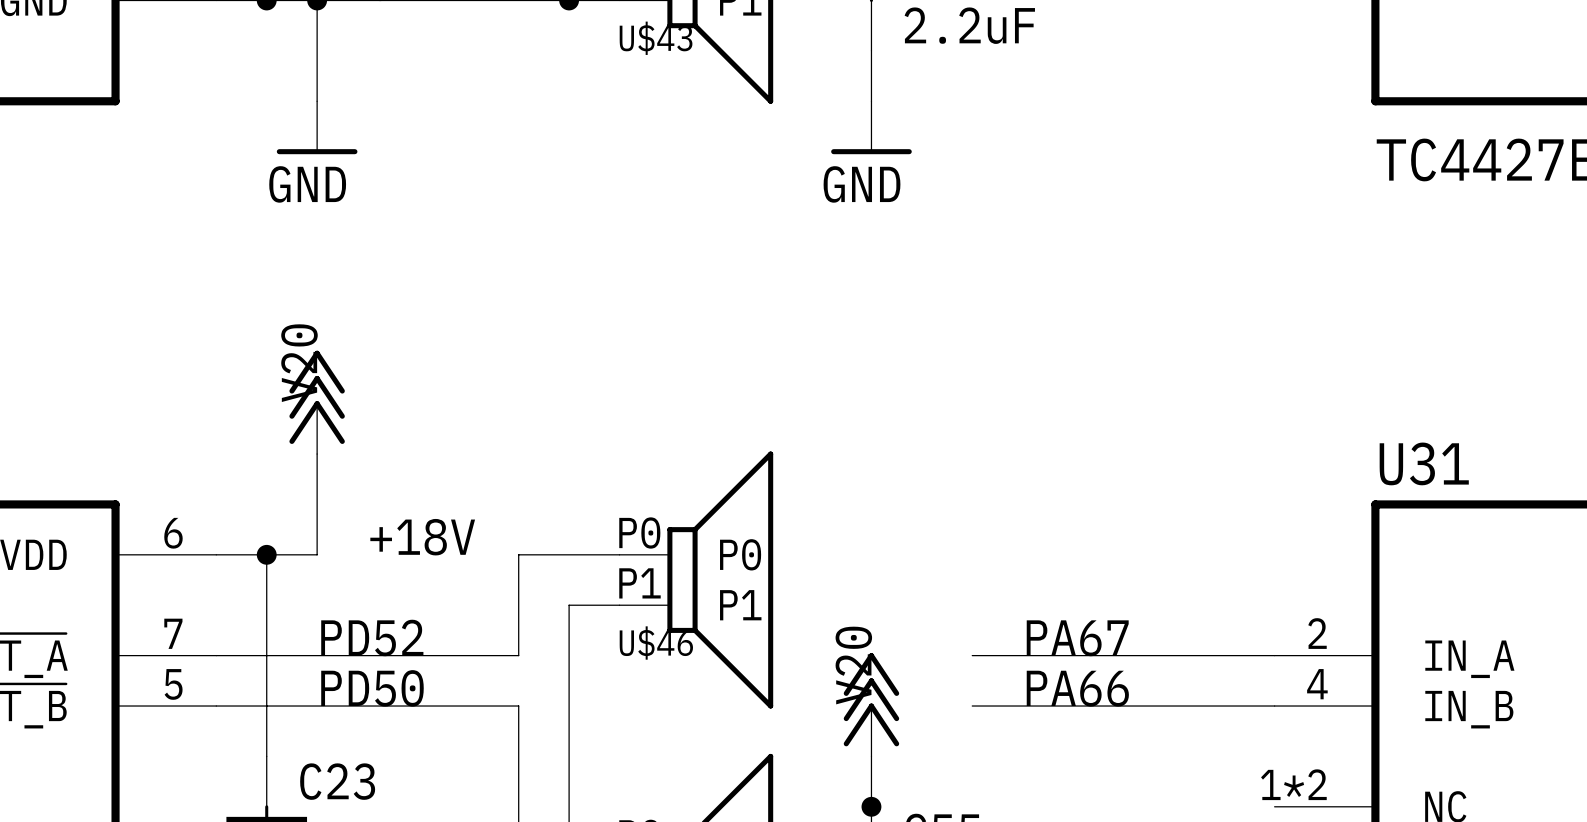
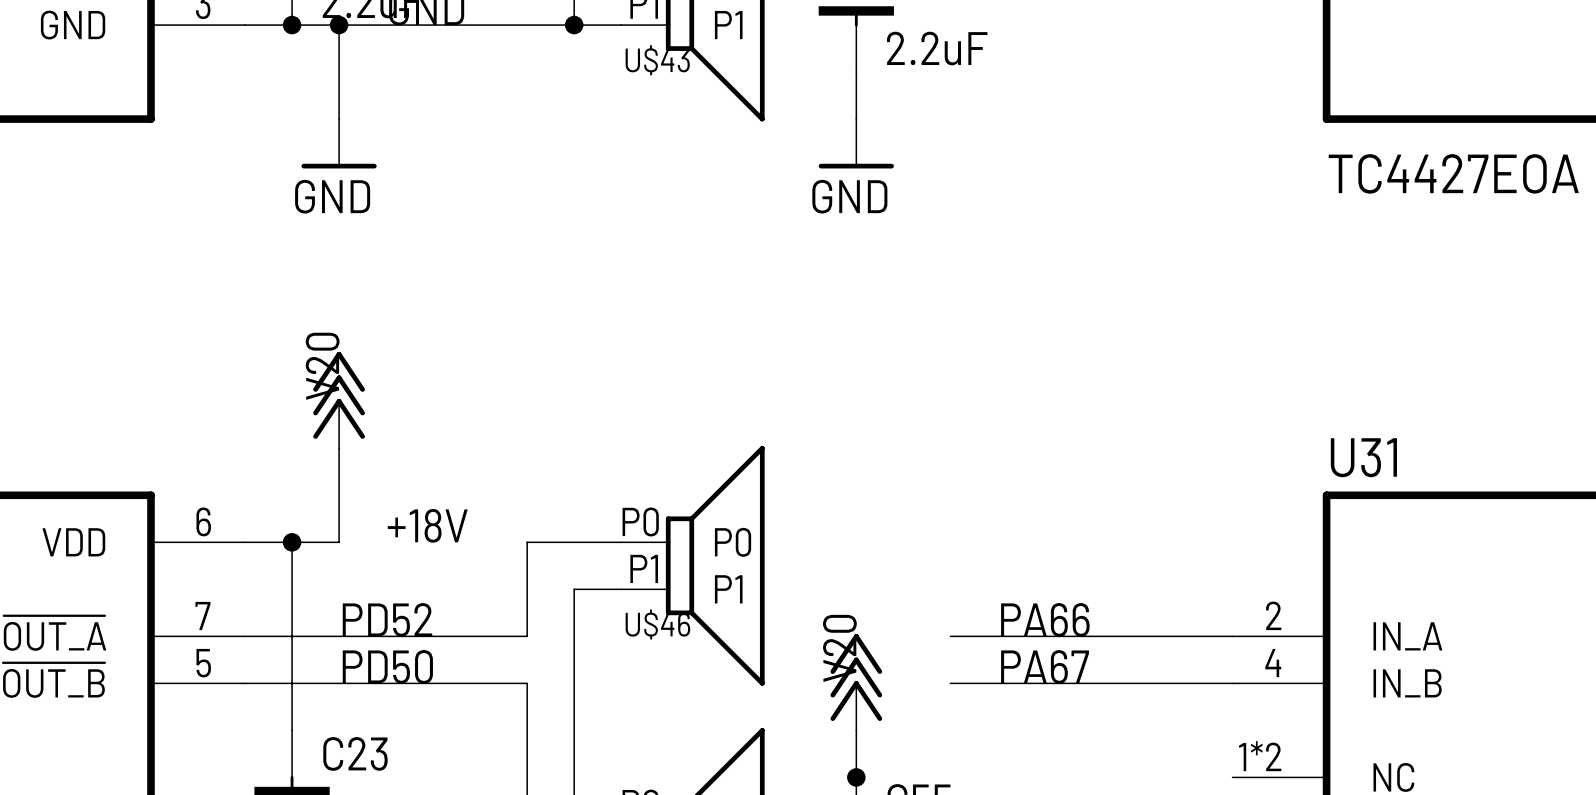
label: PA67 (1077, 638) -> PA66 (1045, 619)
label: PA66 (1077, 688) -> PA67 (1045, 666)

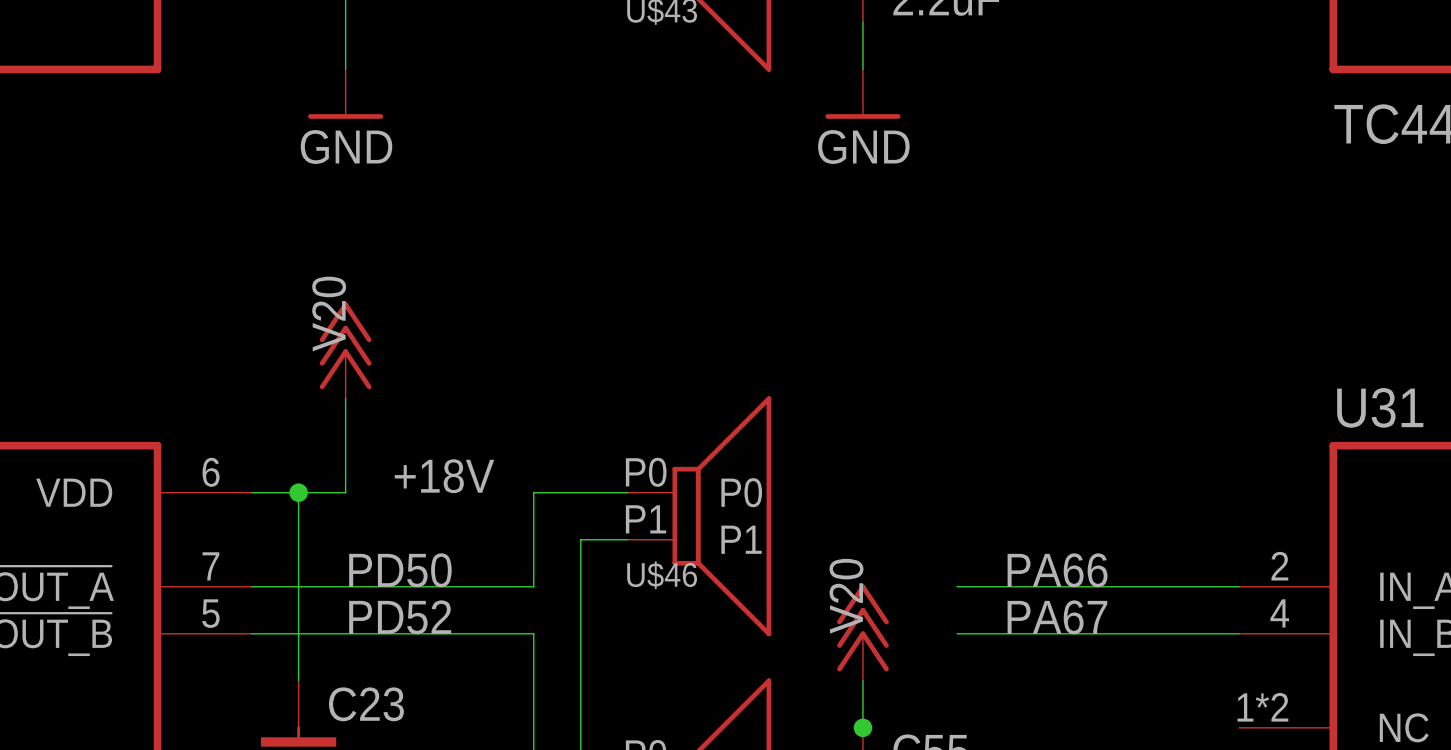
label: PD52 (387, 619) -> PD50 (400, 570)
label: PD50 (387, 666) -> PD52 (400, 617)

